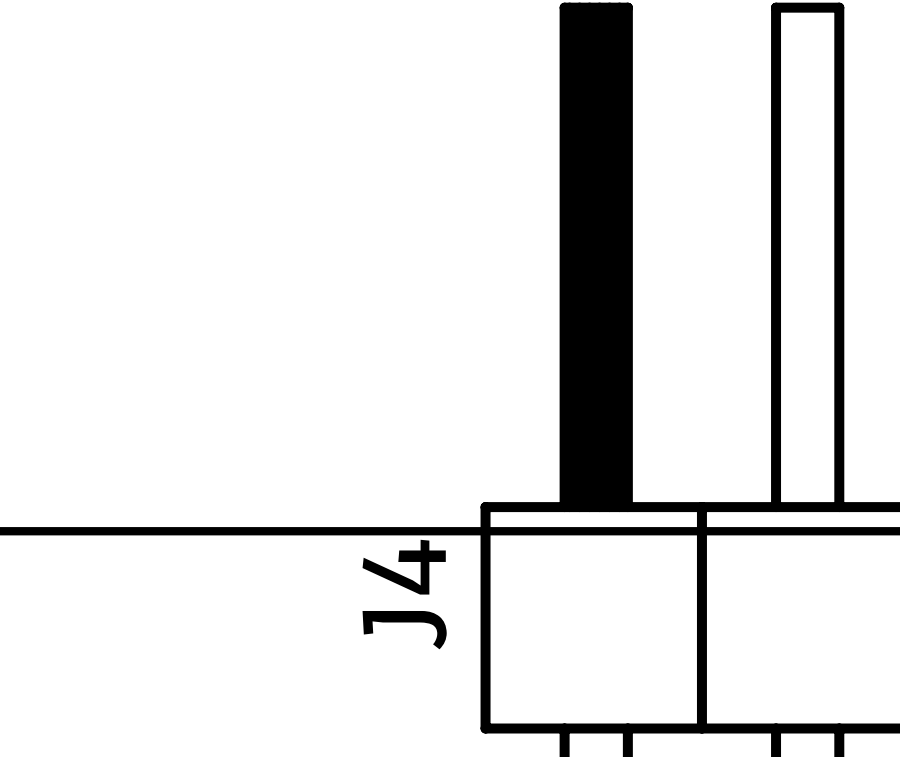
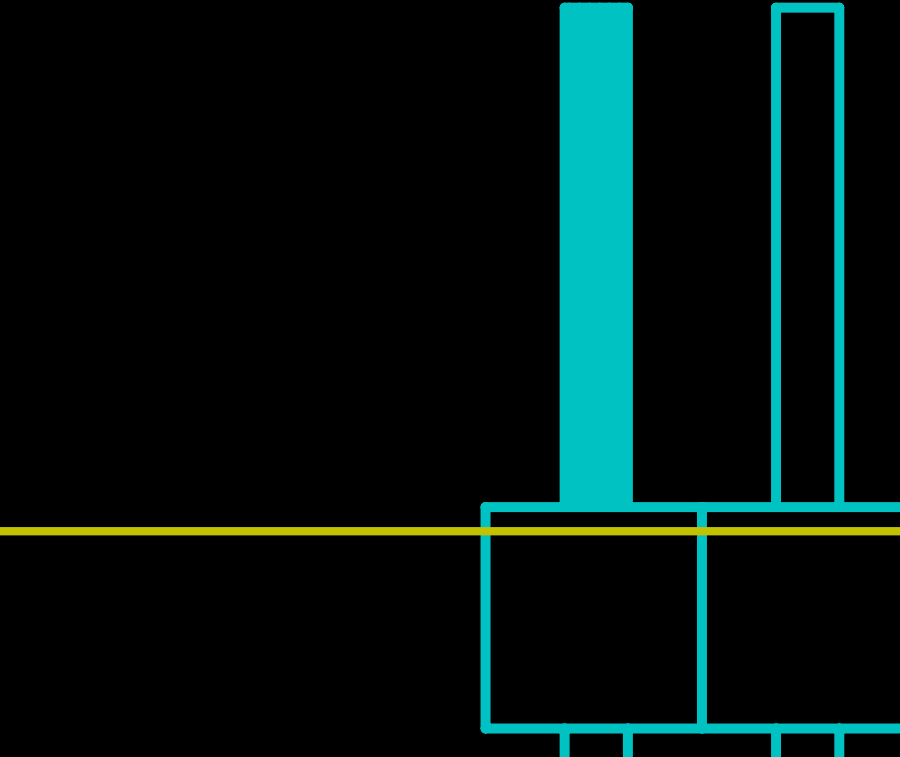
J4 name: J4 (404, 594) -> none

